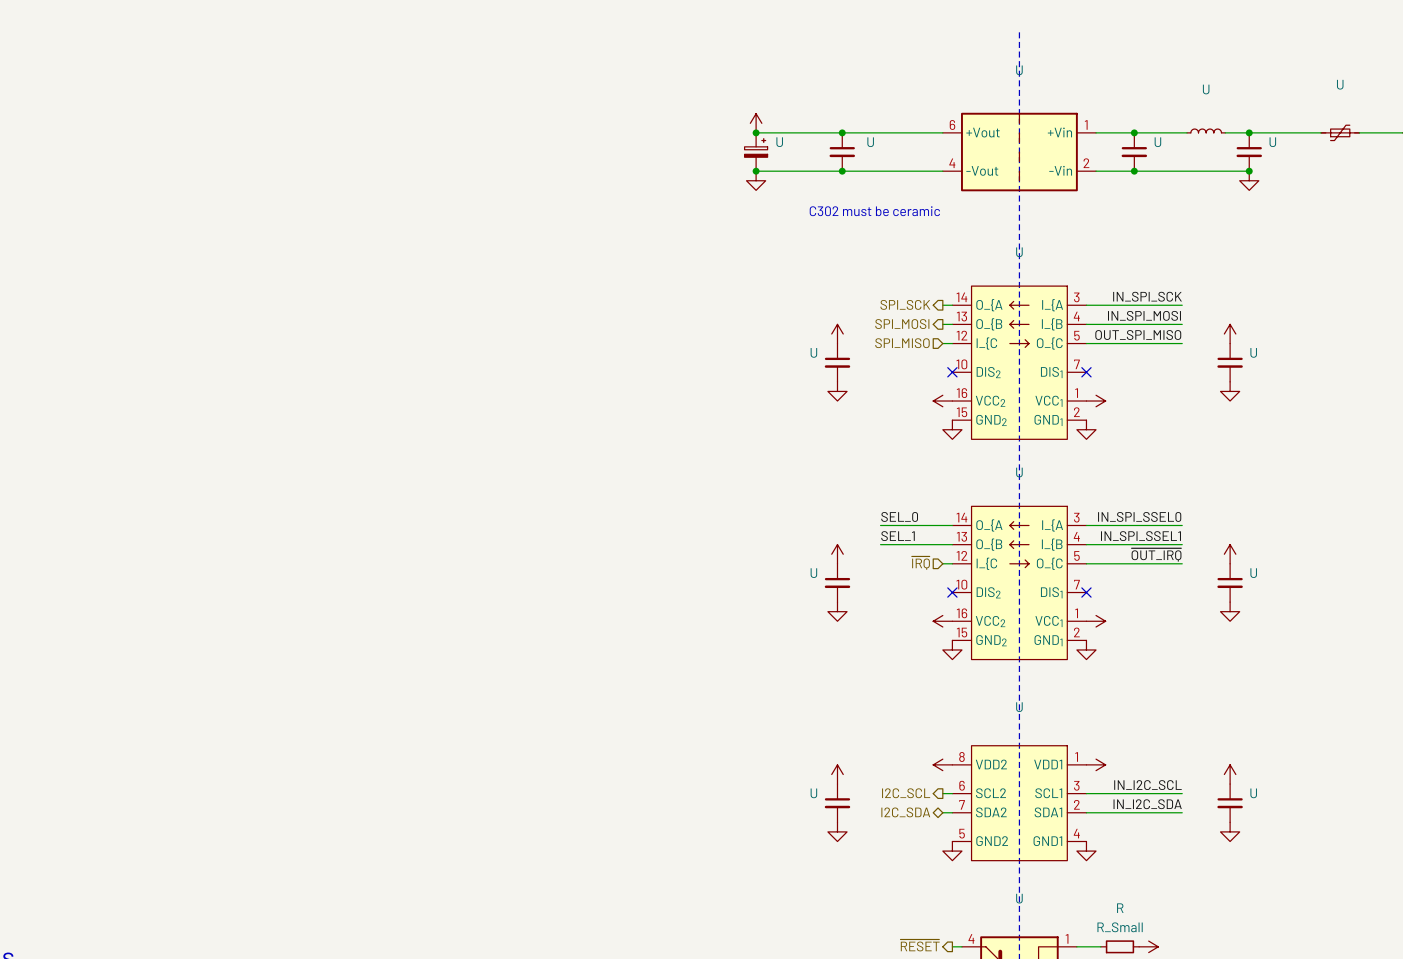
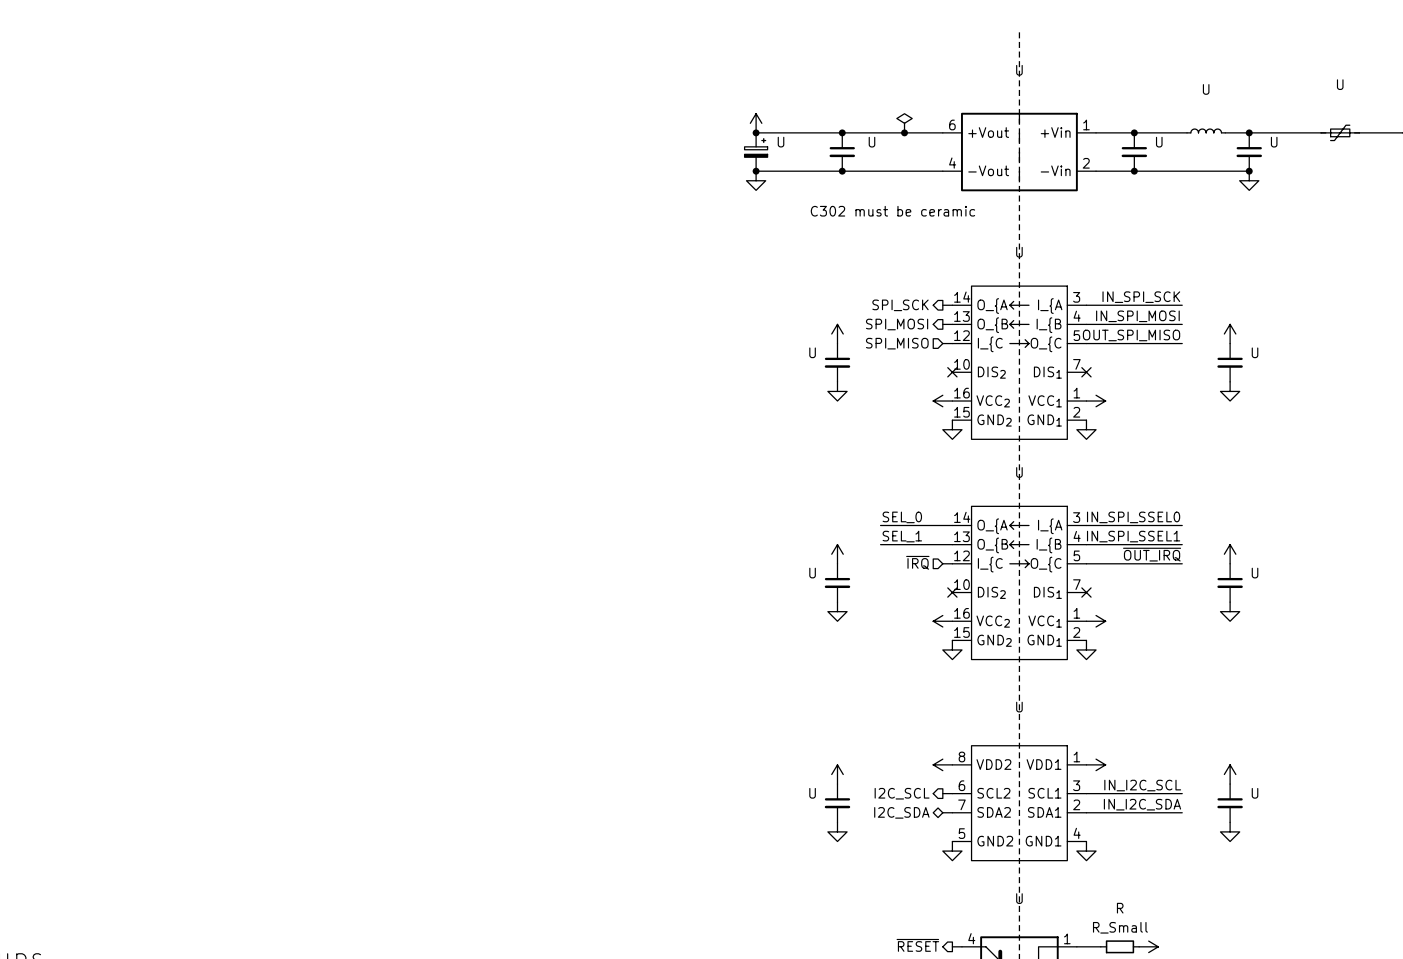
power symbol: none -> (904, 123)
junction: none -> (904, 132)

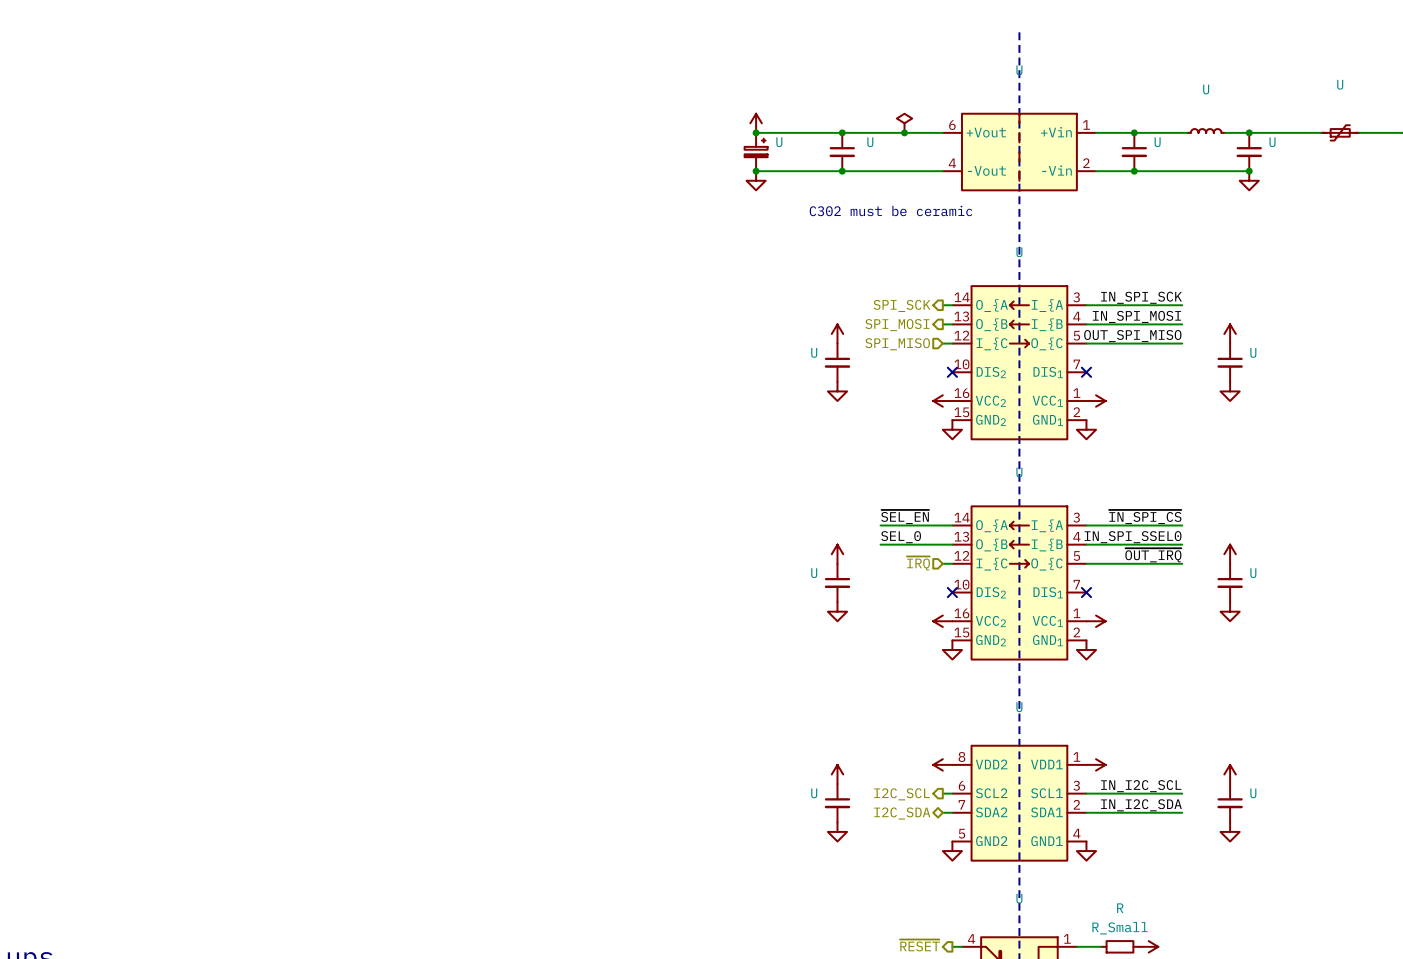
label: SEL_0 (902, 517) -> ~{SEL_EN} (905, 517)
label: IN_SPI_SSEL0 (1133, 517) -> ~{IN_SPI_CS} (1145, 517)
label: SEL_1 (902, 536) -> SEL_0 (901, 537)
label: IN_SPI_SSEL1 (1133, 536) -> IN_SPI_SSEL0 (1133, 537)

